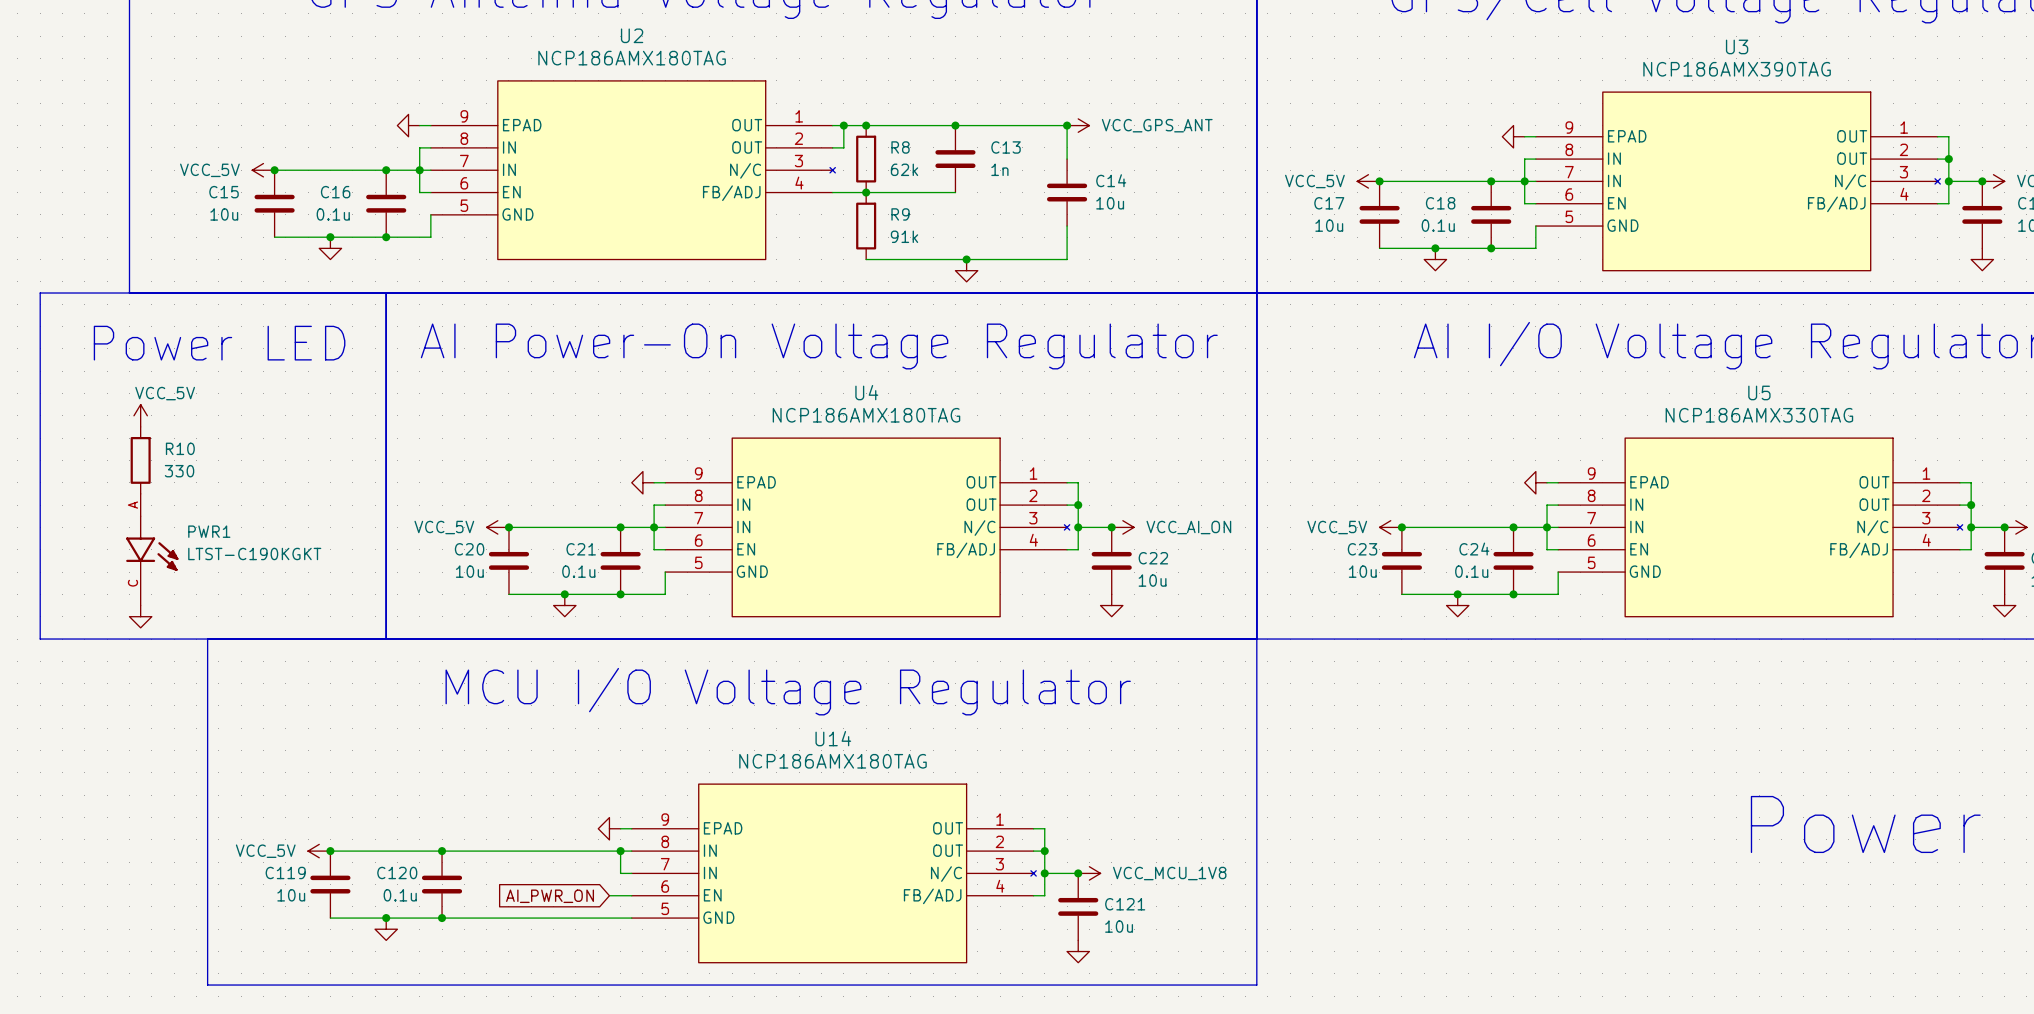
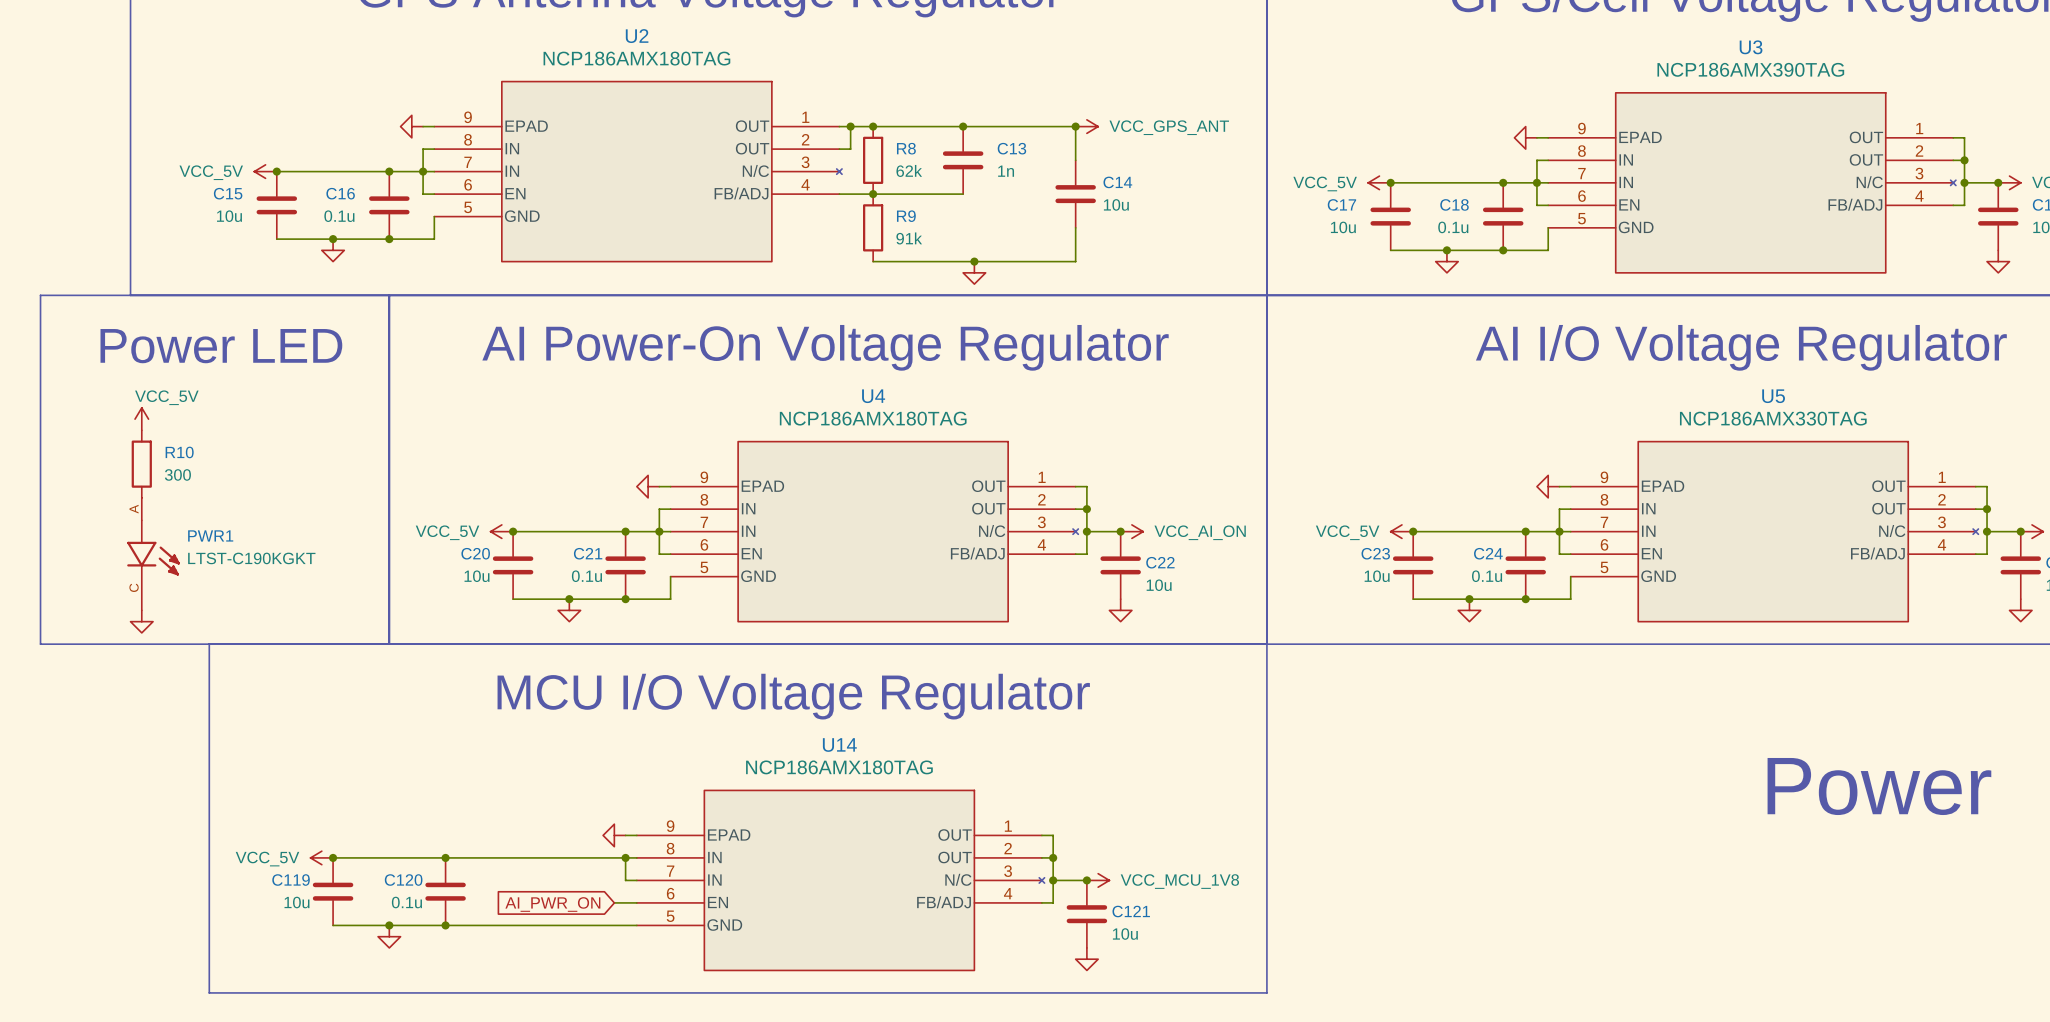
R10 value: 330 (179, 471) -> 300 (177, 474)
text position: Power (1865, 824) -> Power (1879, 786)

